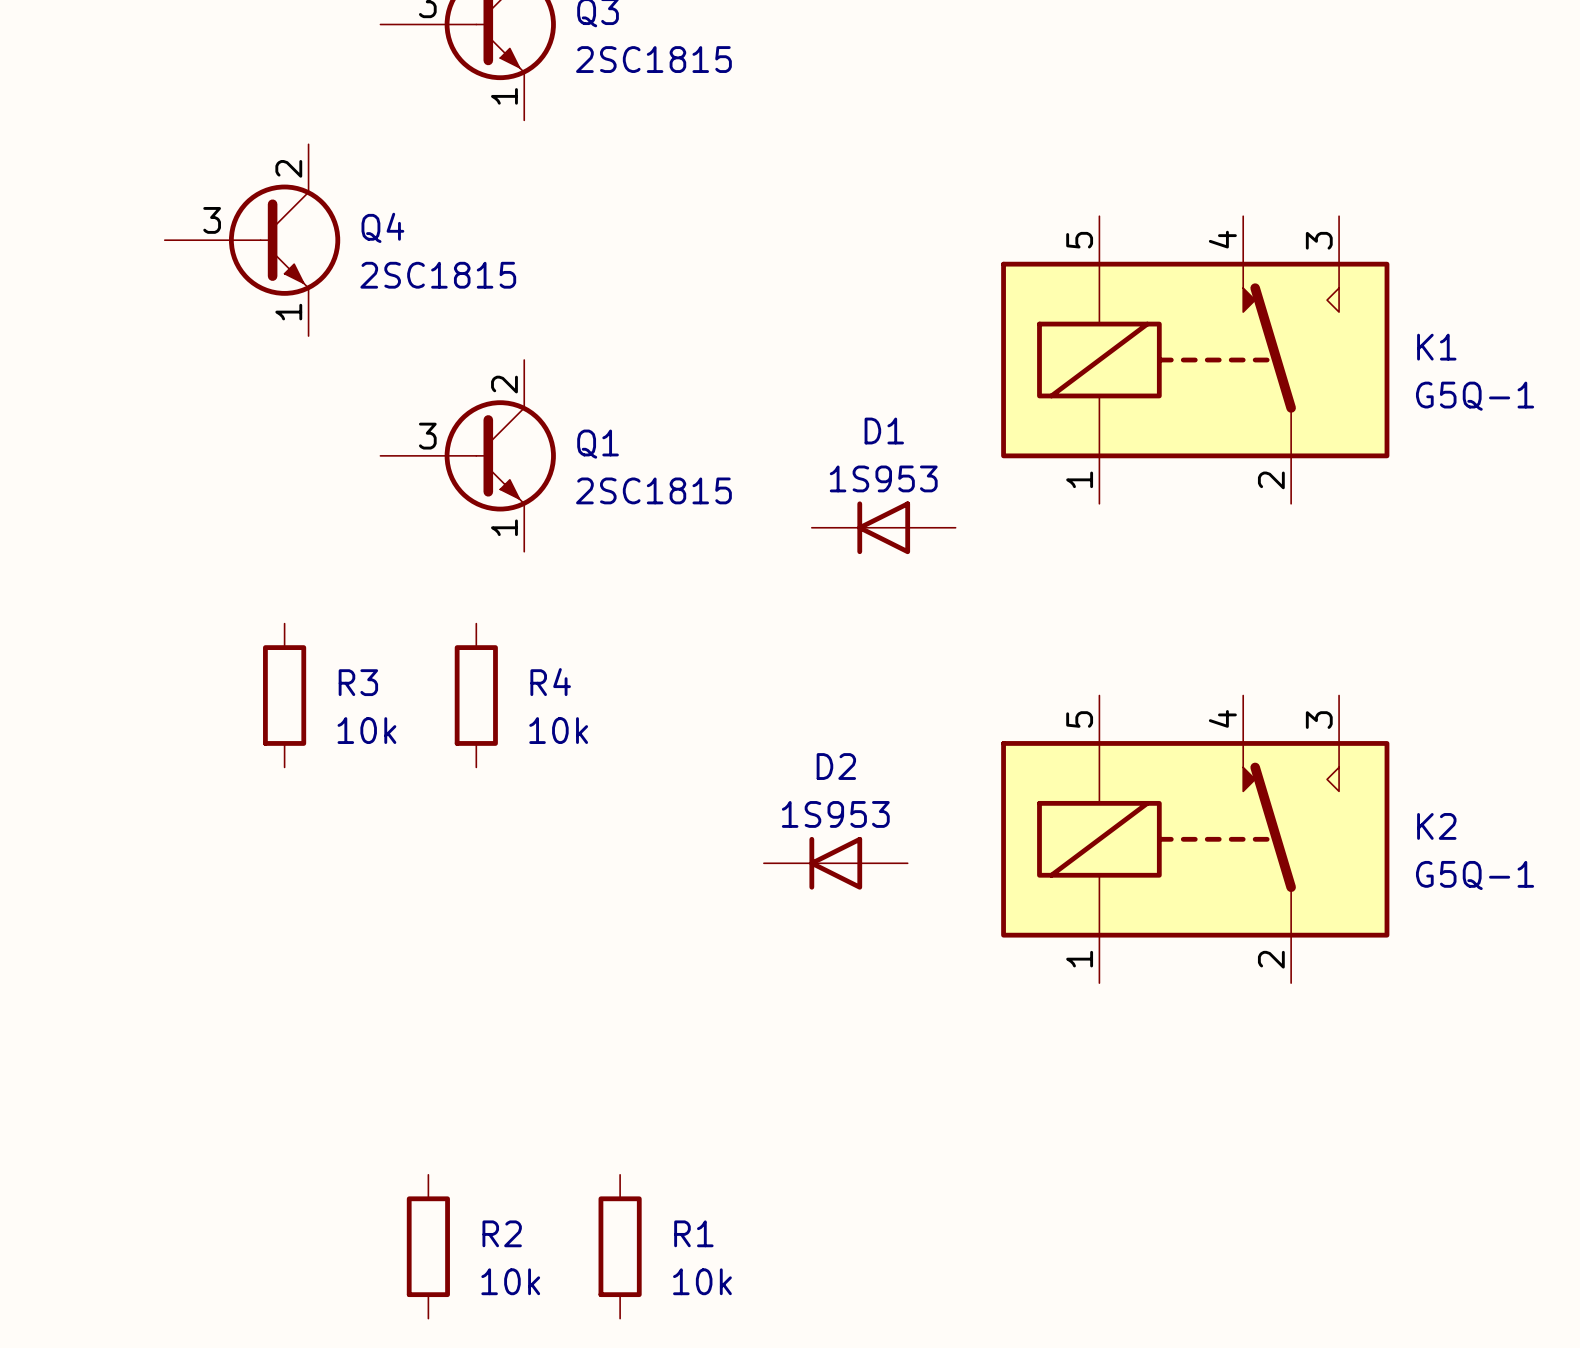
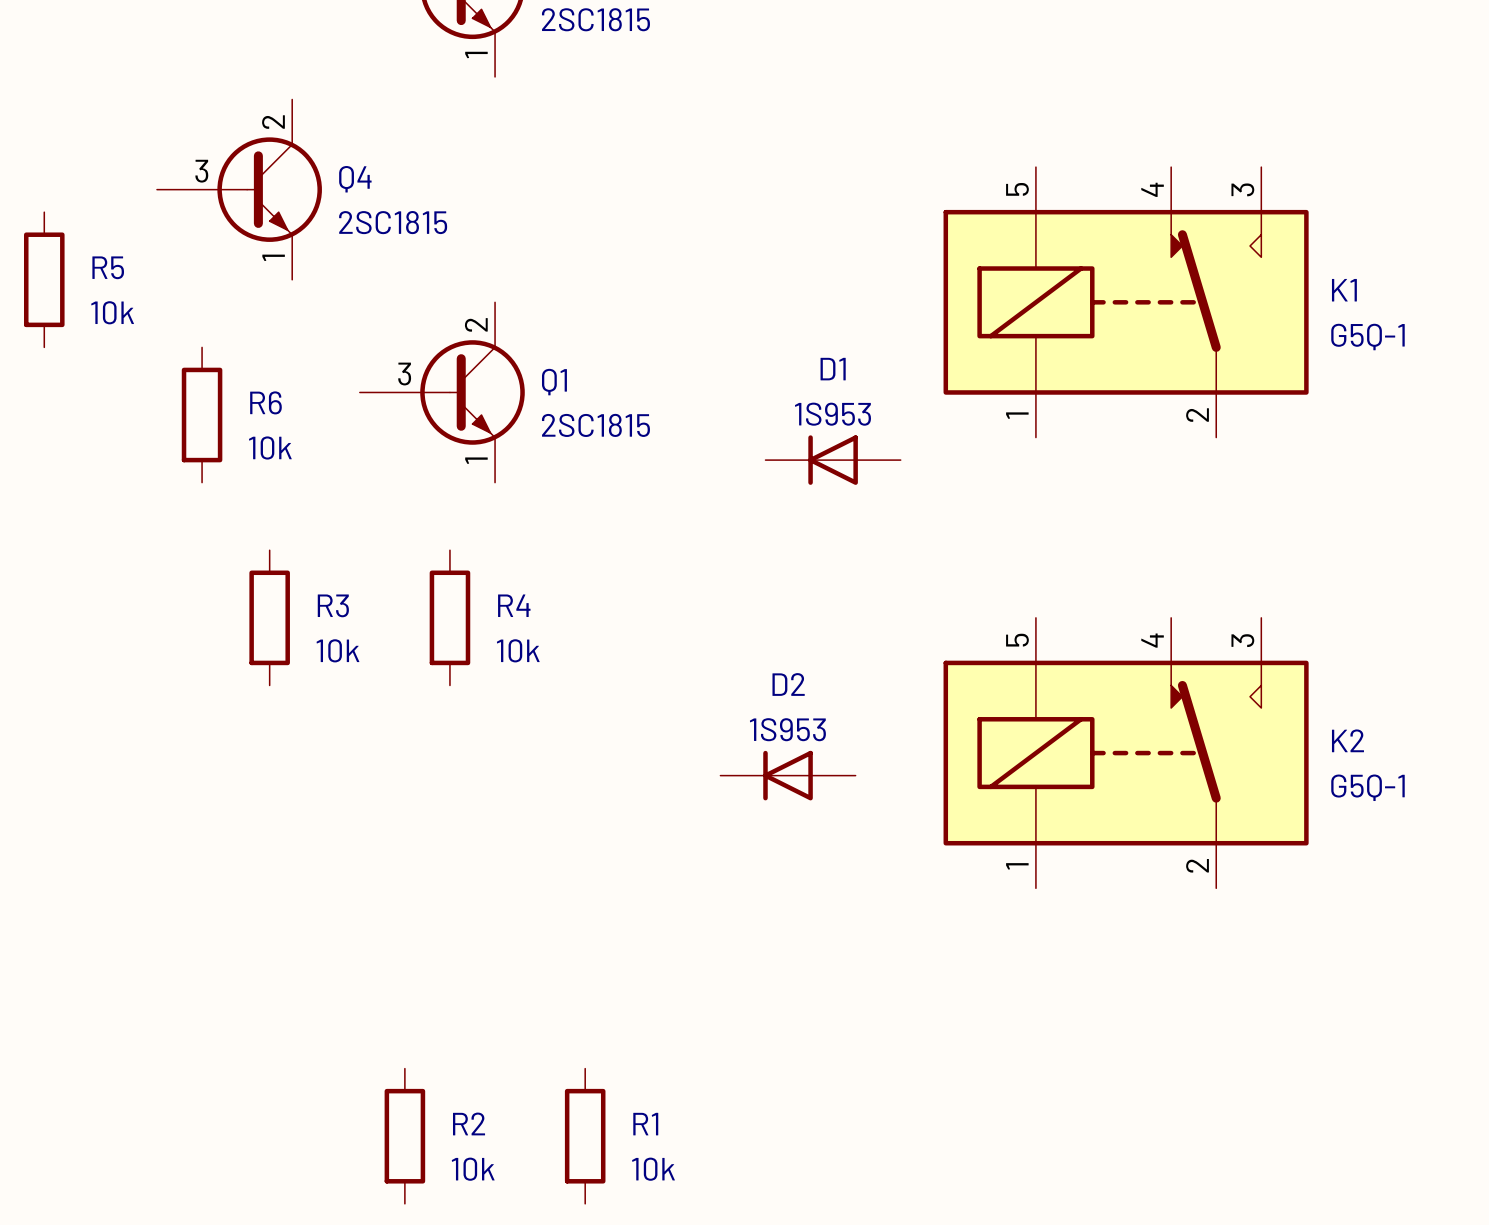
R5: none -> 10k (44, 279)
R6: none -> 10k (202, 415)

